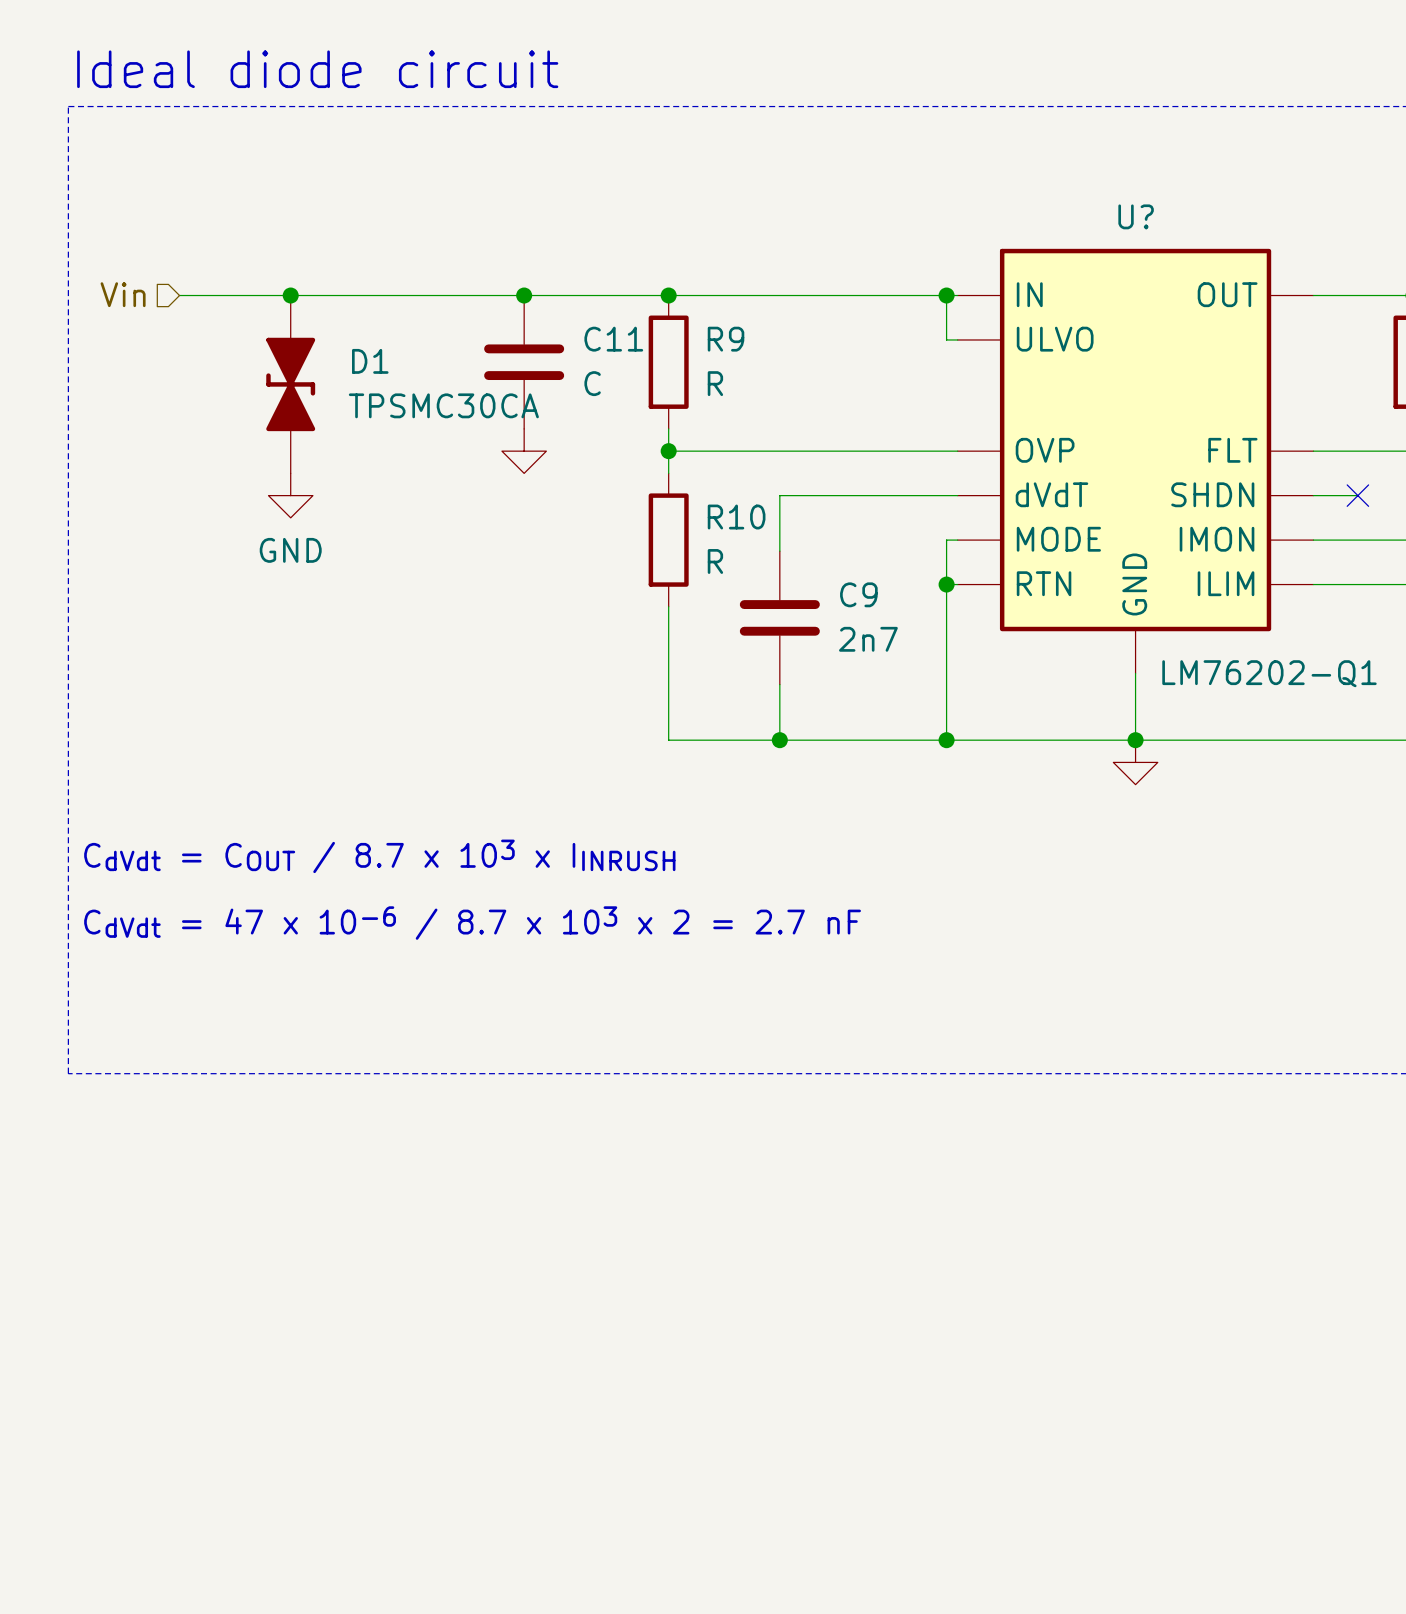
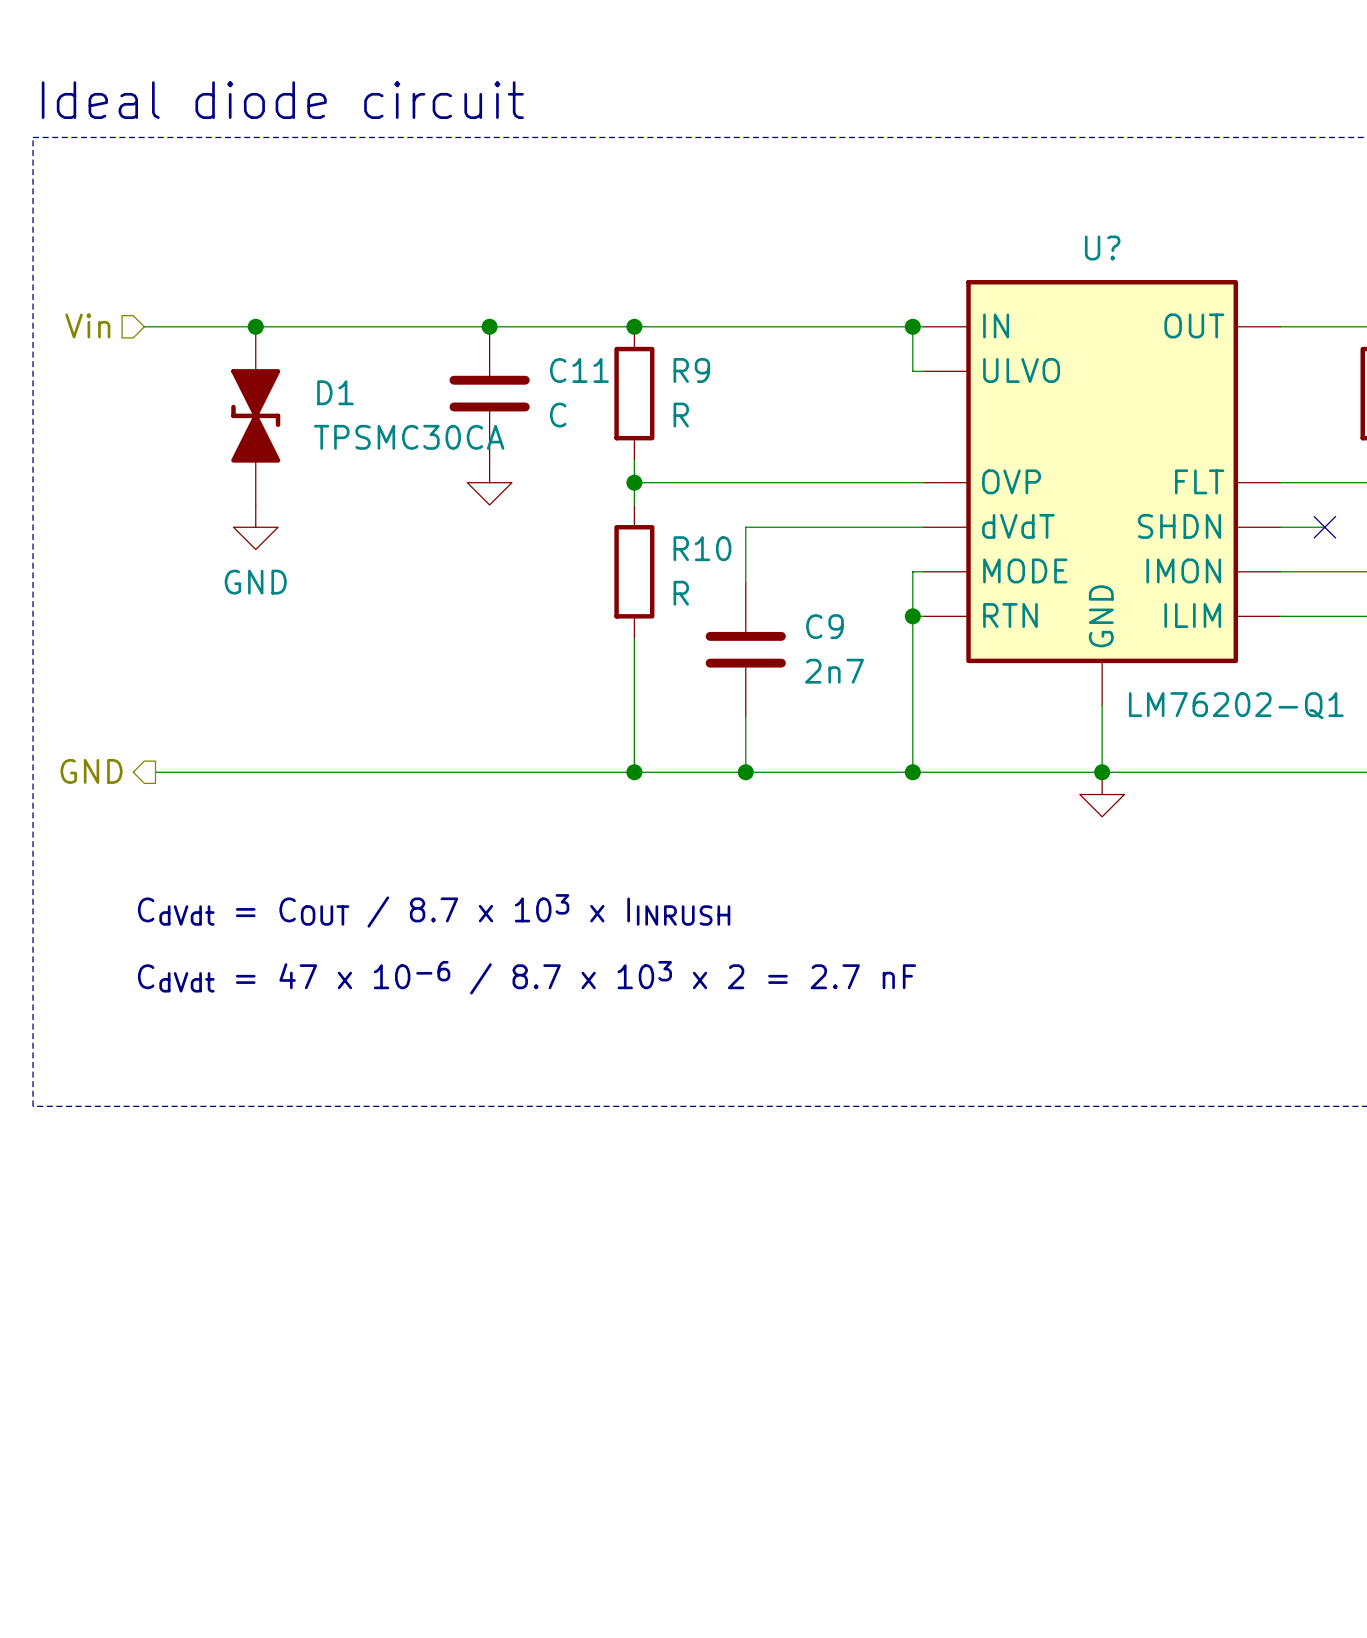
hierarchical label: none -> GND (91, 771)
wire: none -> (155, 772) (634, 772)
junction: none -> (634, 772)
text position: CdVdt = COUT / 8.7 x 103 x IINRUSH (379, 856) -> CdVdt = COUT / 8.7 x 103 x IINRUSH (434, 910)
text position: CdVdt = 47 x 10-6 / 8.7 x 103 x 2 = 2.7 nF (472, 923) -> CdVdt = 47 x 10-6 / 8.7 x 103 x 2 = 2.7 nF (527, 977)

